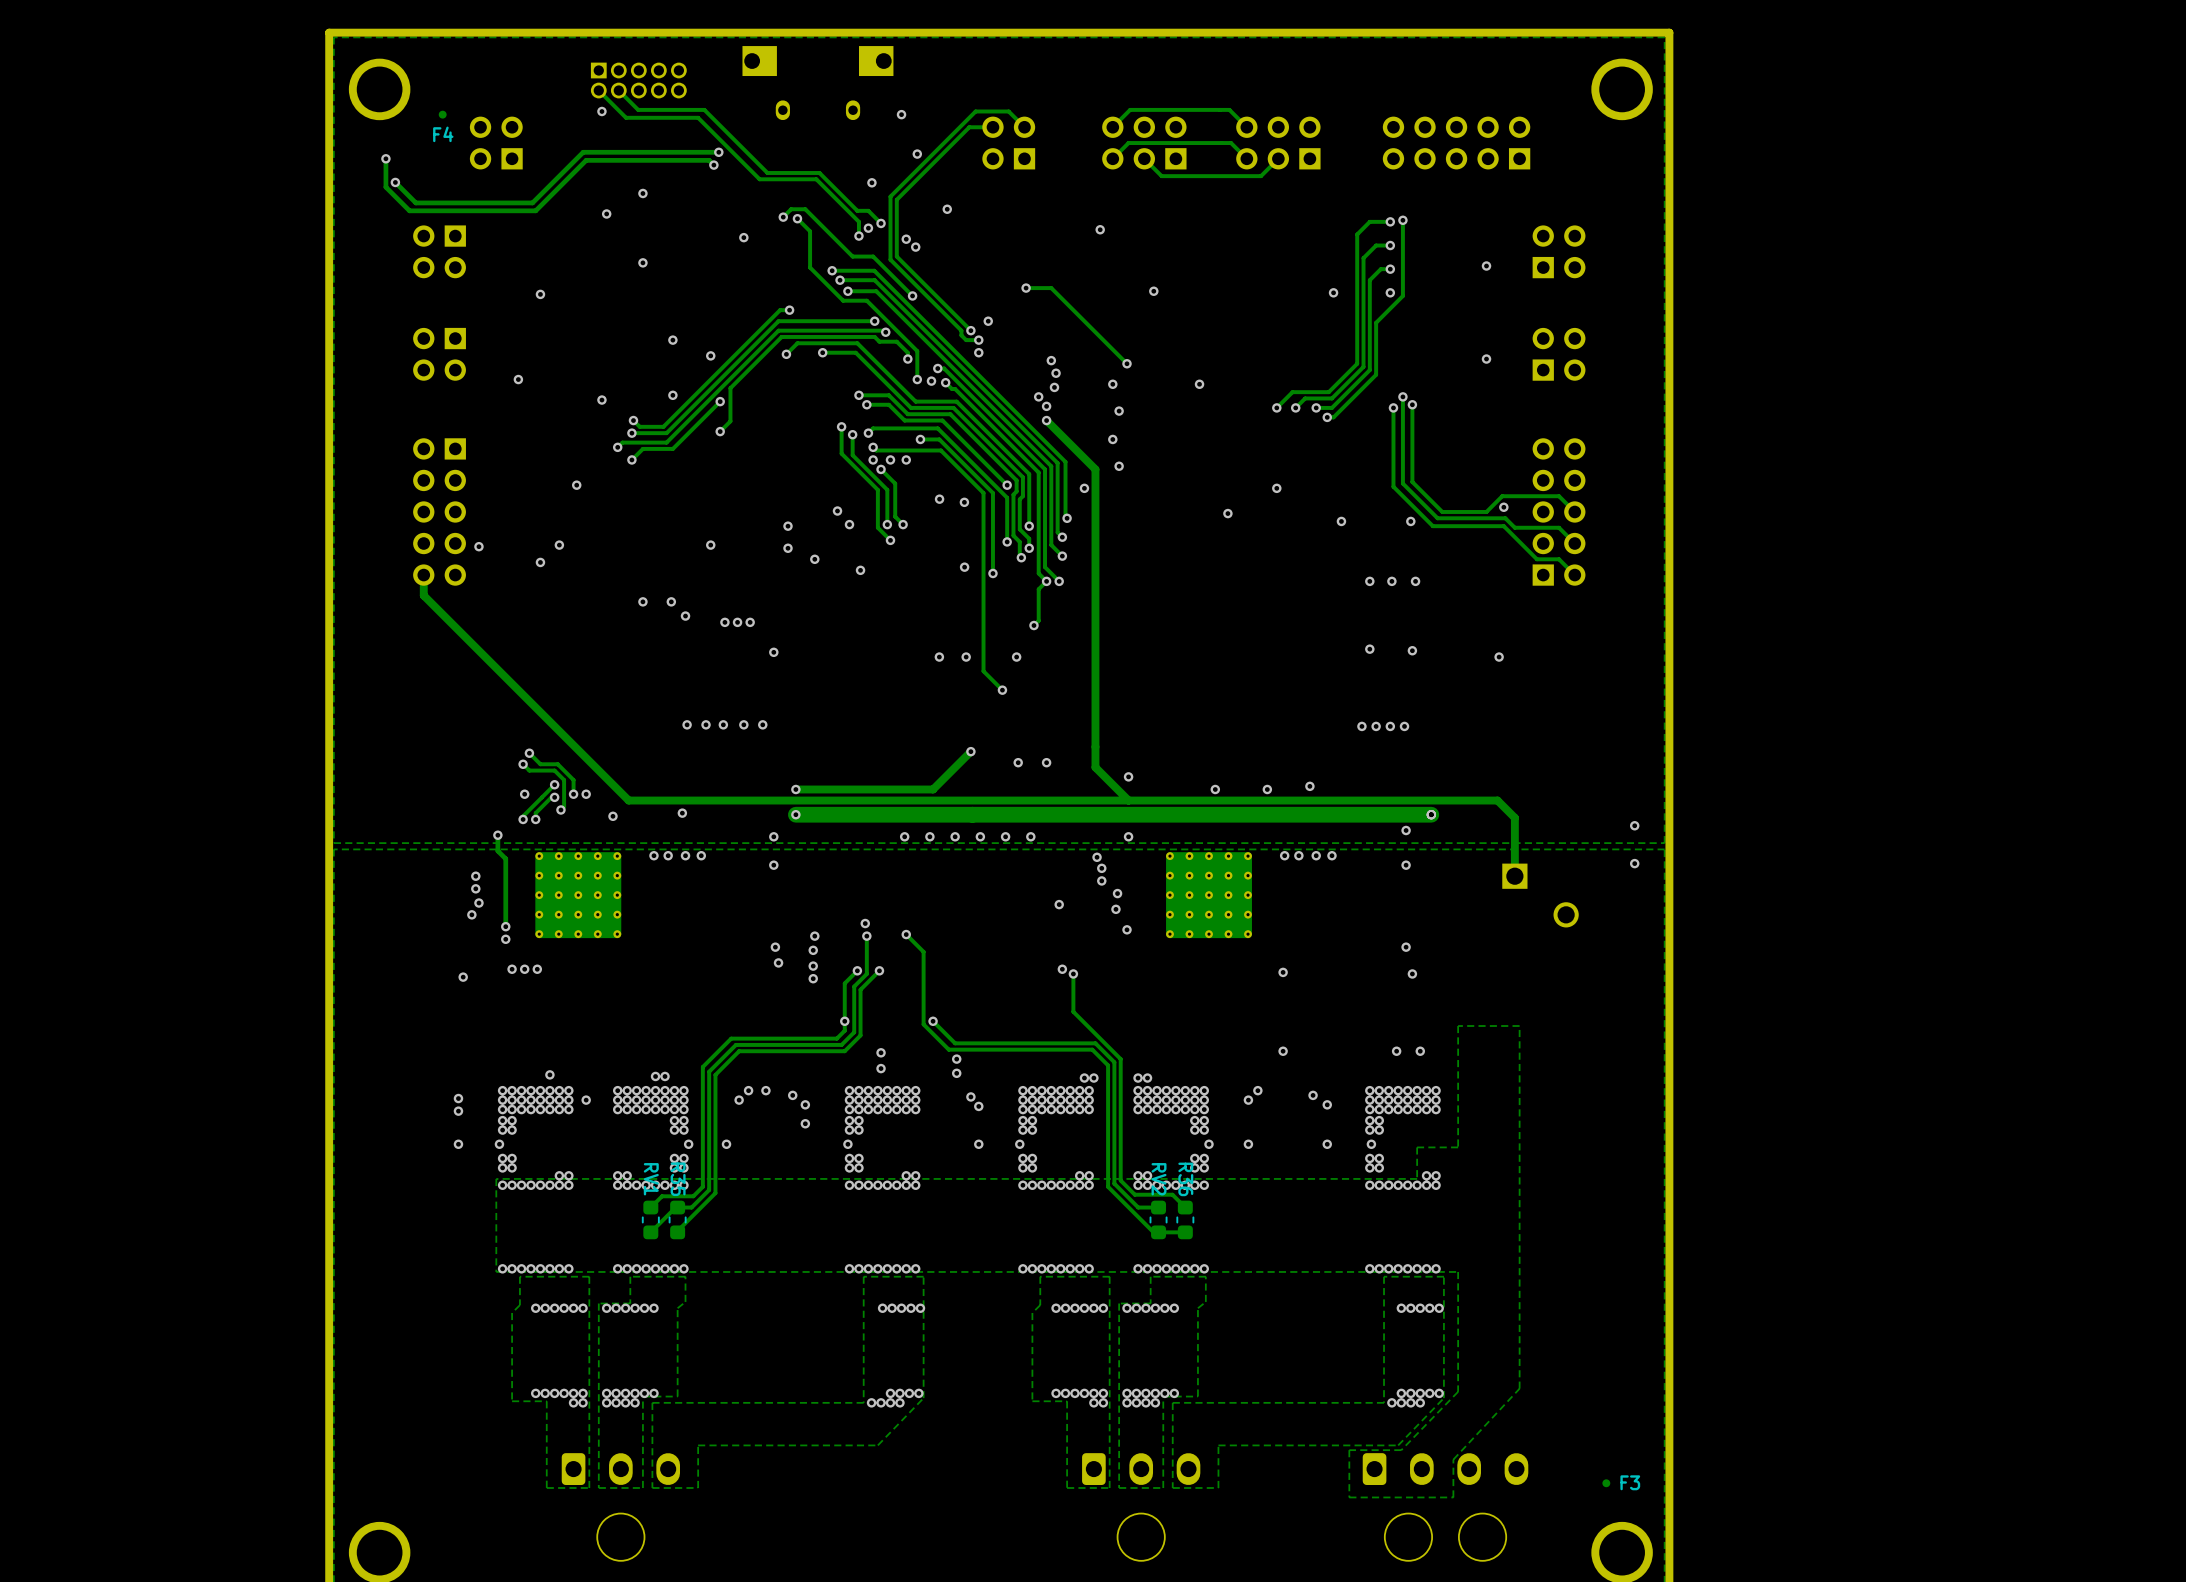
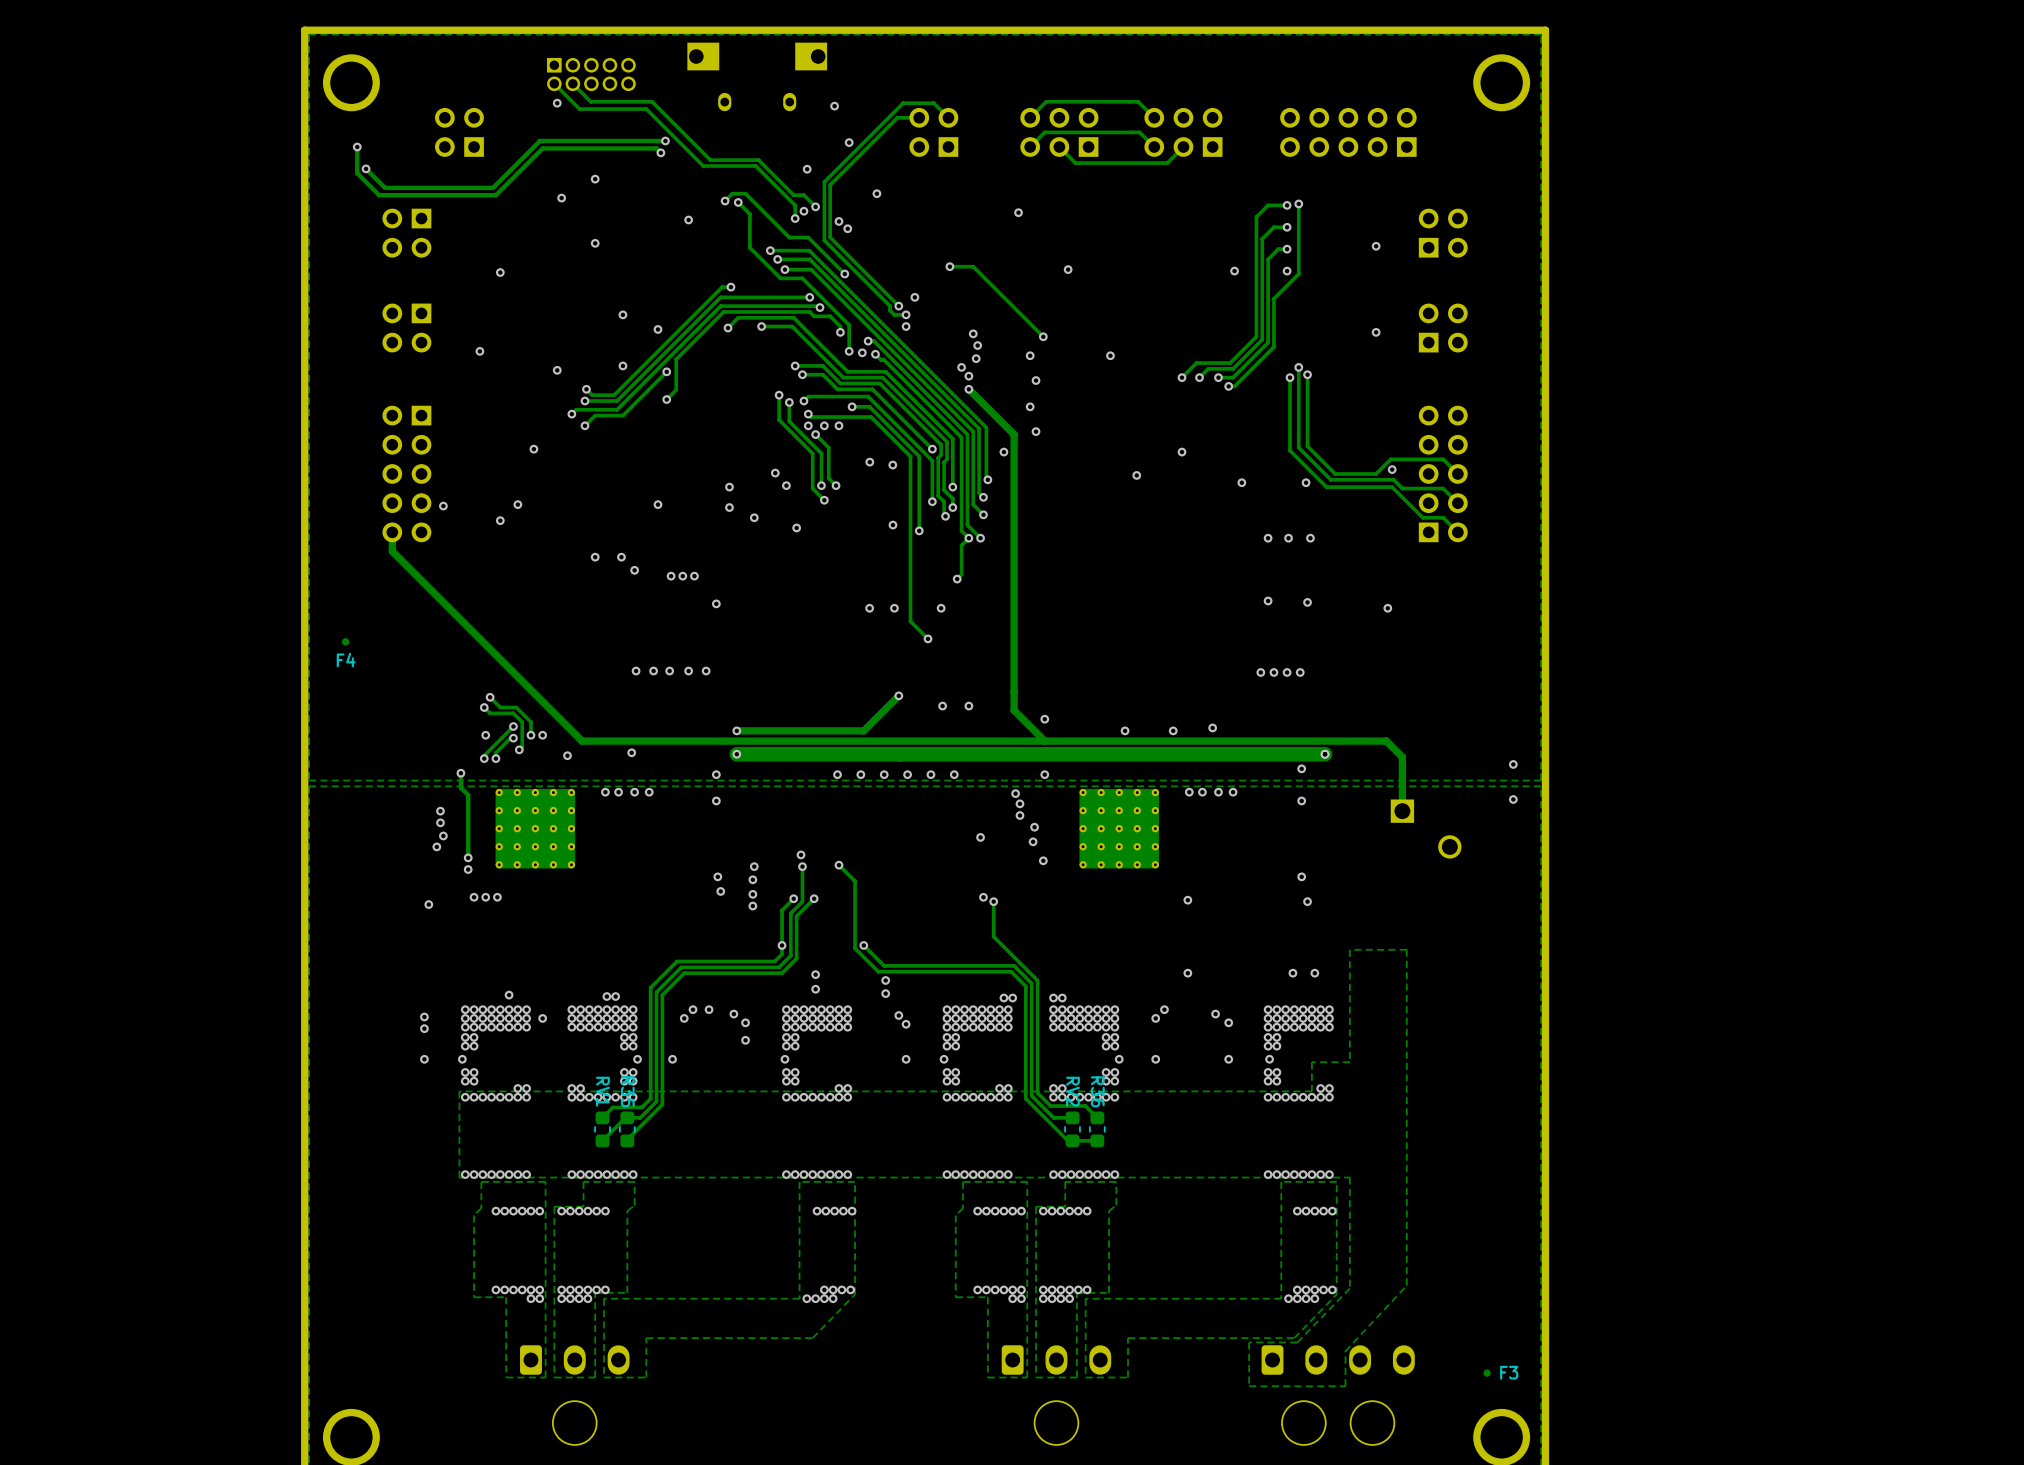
F4 position: (442, 114) -> (345, 641)

